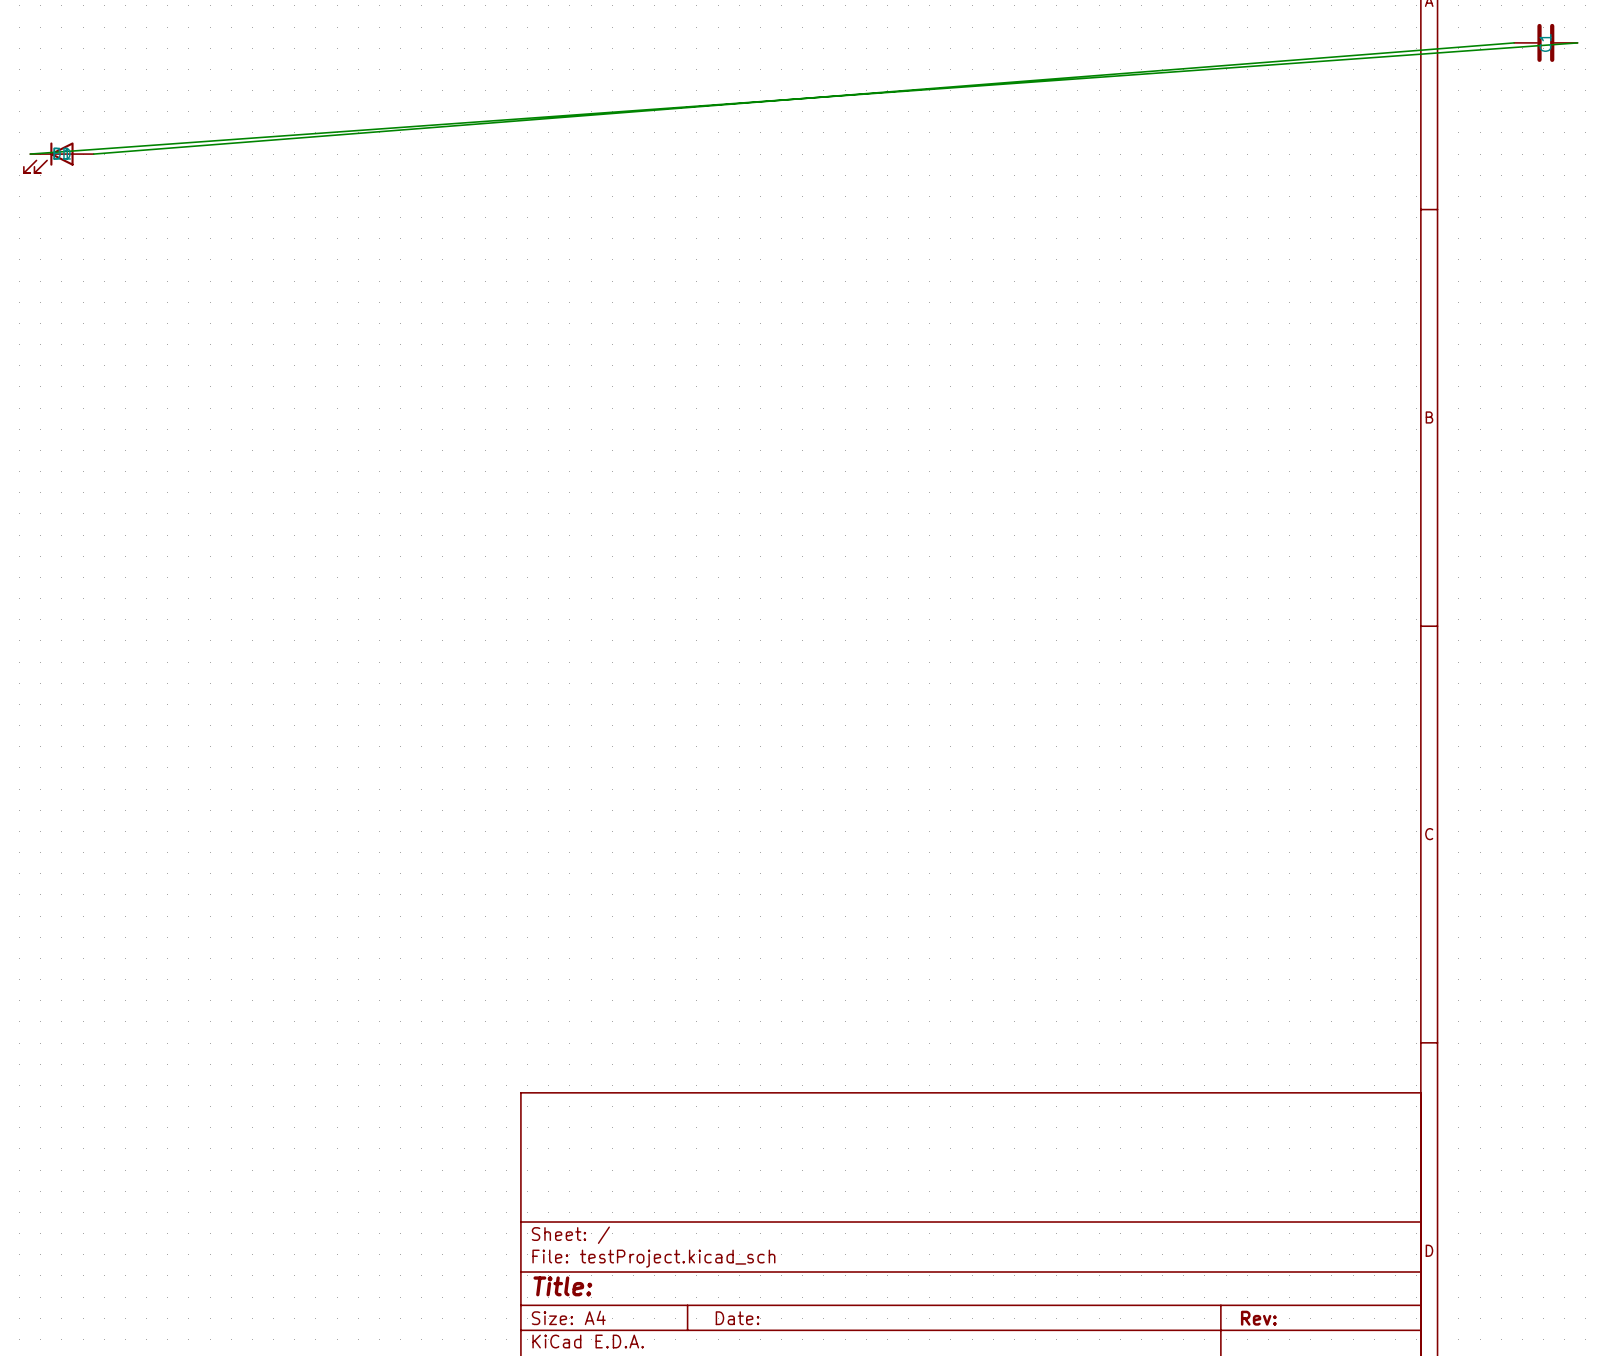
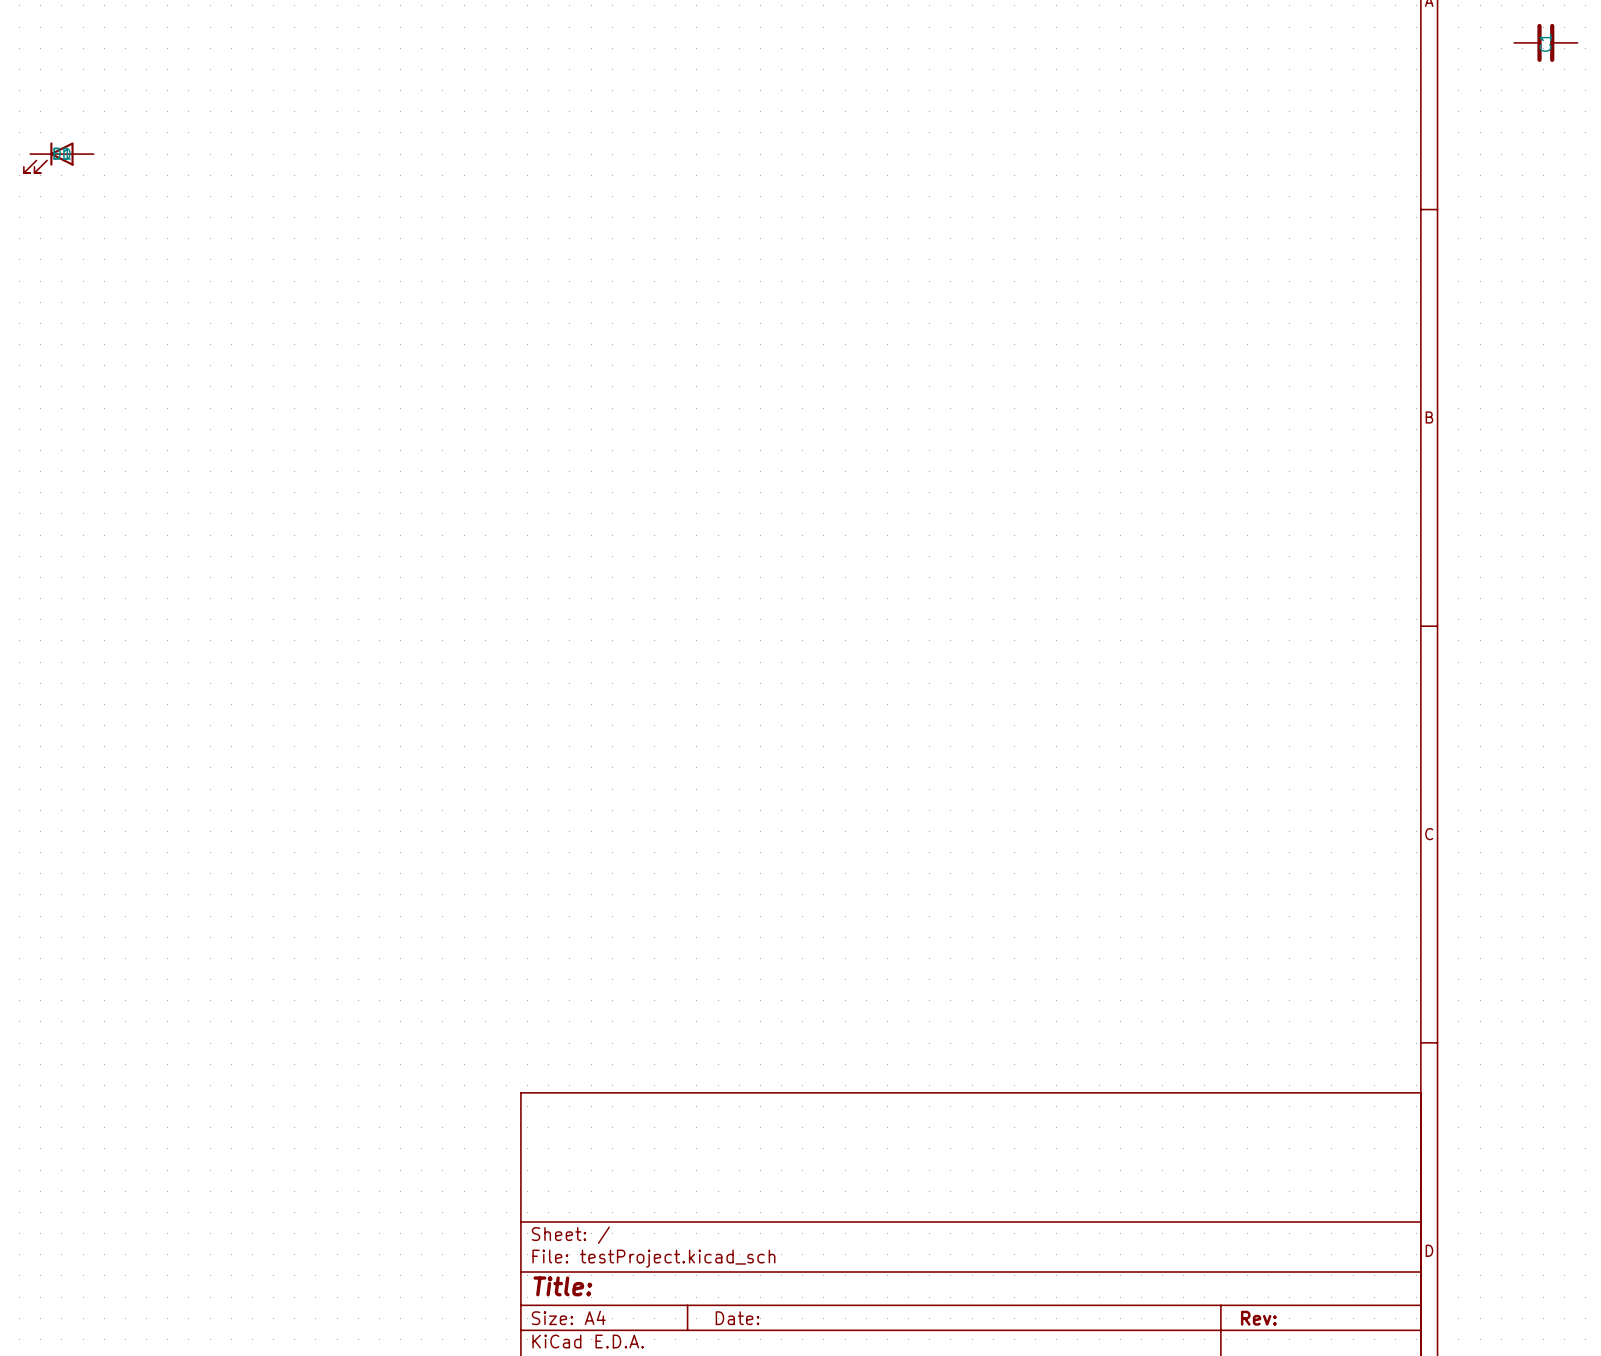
wire: (1514, 42) (93, 154) -> none
wire: (1577, 42) (30, 154) -> none

